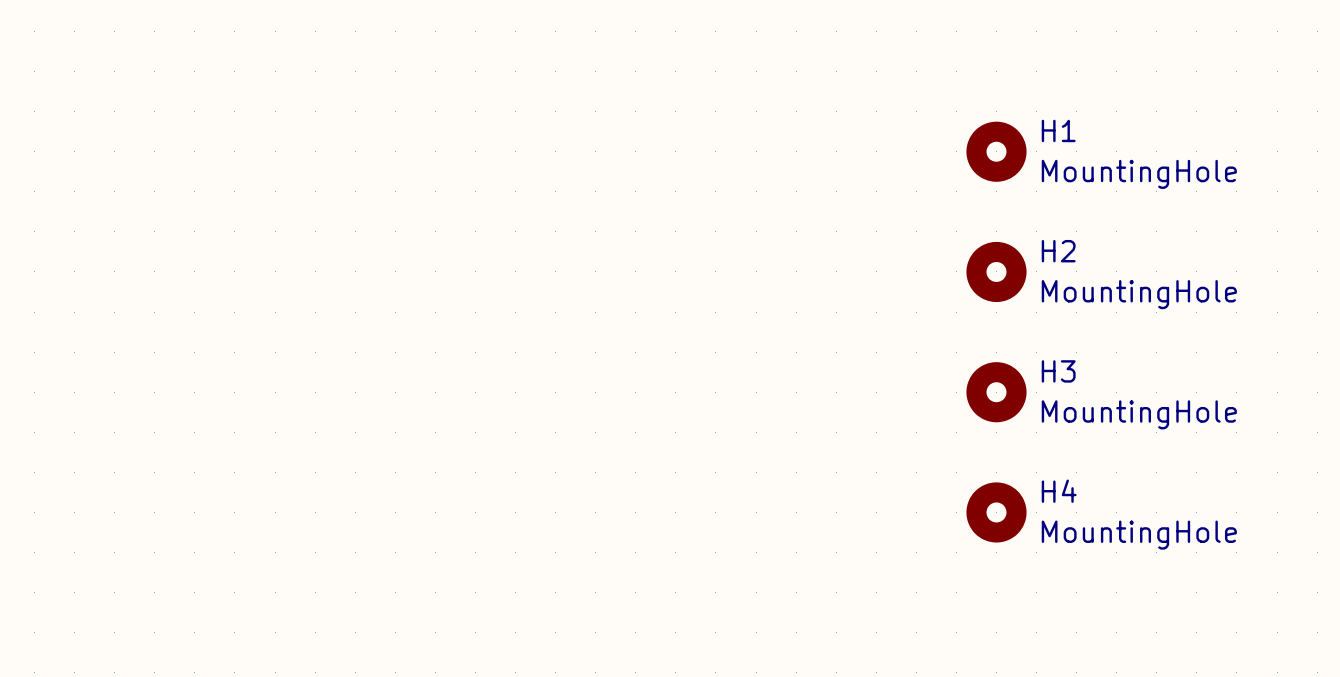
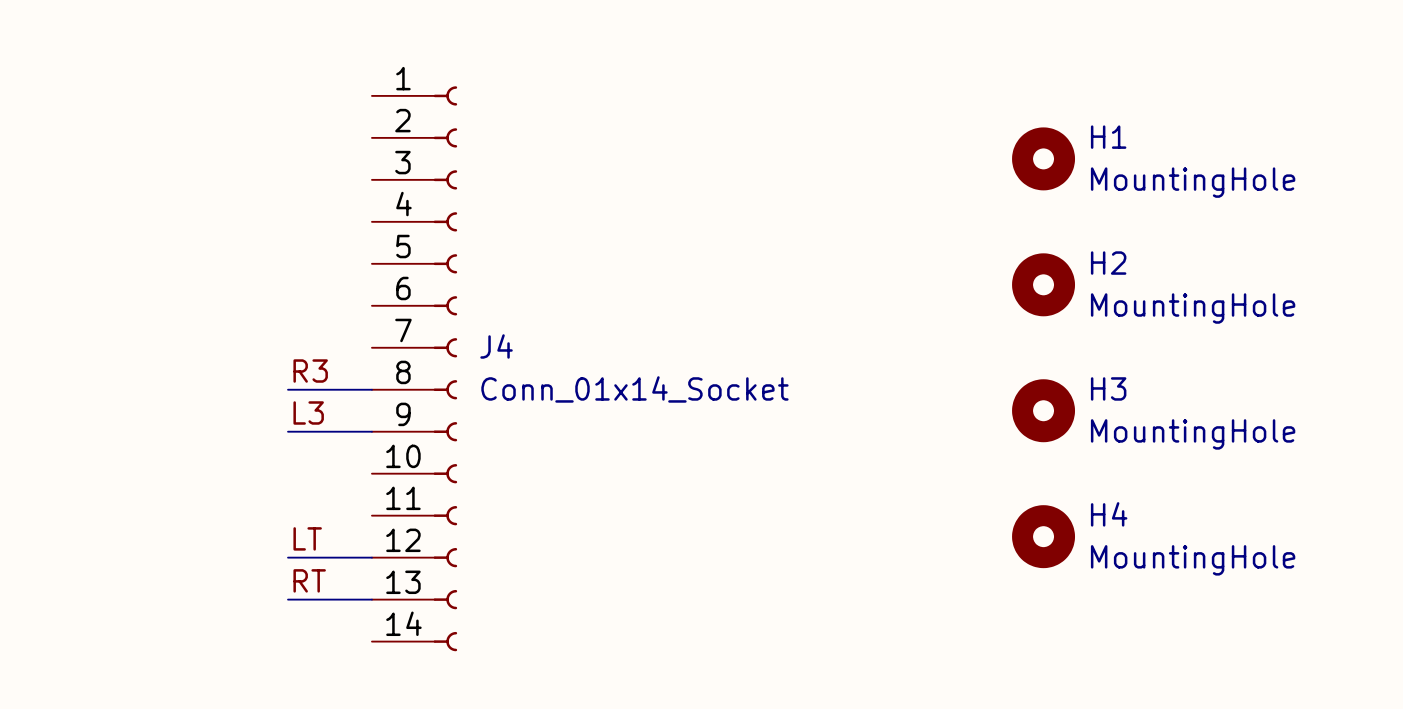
J4: none -> Conn_01x14_Socket (414, 368)
label: none -> R3 (310, 371)
wire: none -> (288, 389) (371, 389)
label: none -> L3 (308, 412)
wire: none -> (288, 431) (371, 431)
label: none -> LT (307, 538)
wire: none -> (288, 557) (371, 557)
label: none -> RT (309, 580)
wire: none -> (288, 599) (371, 599)

